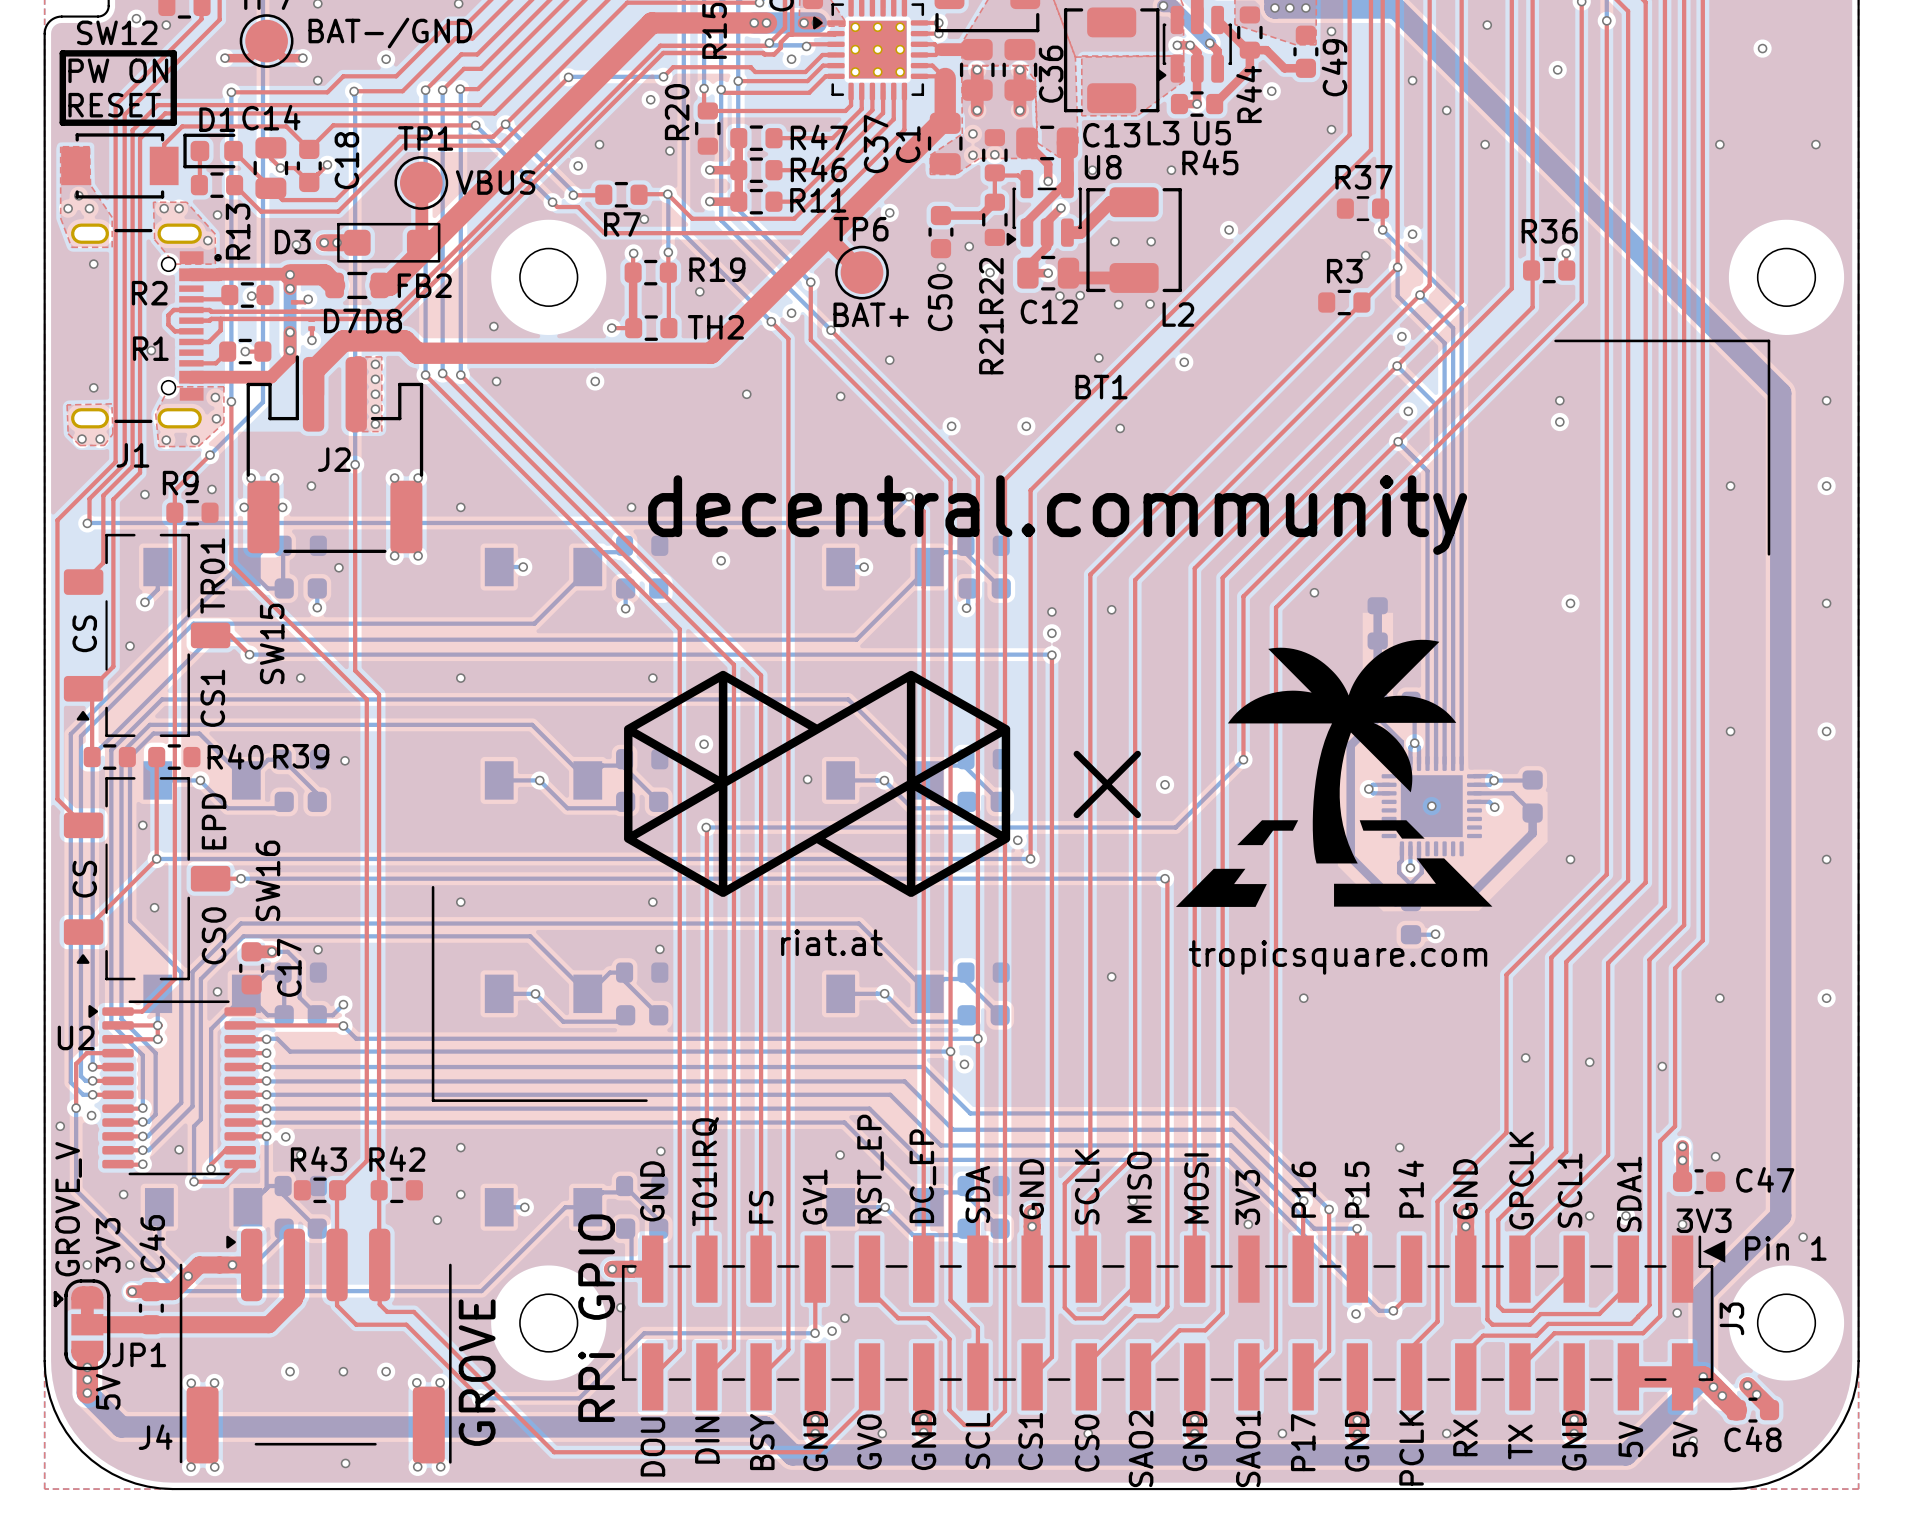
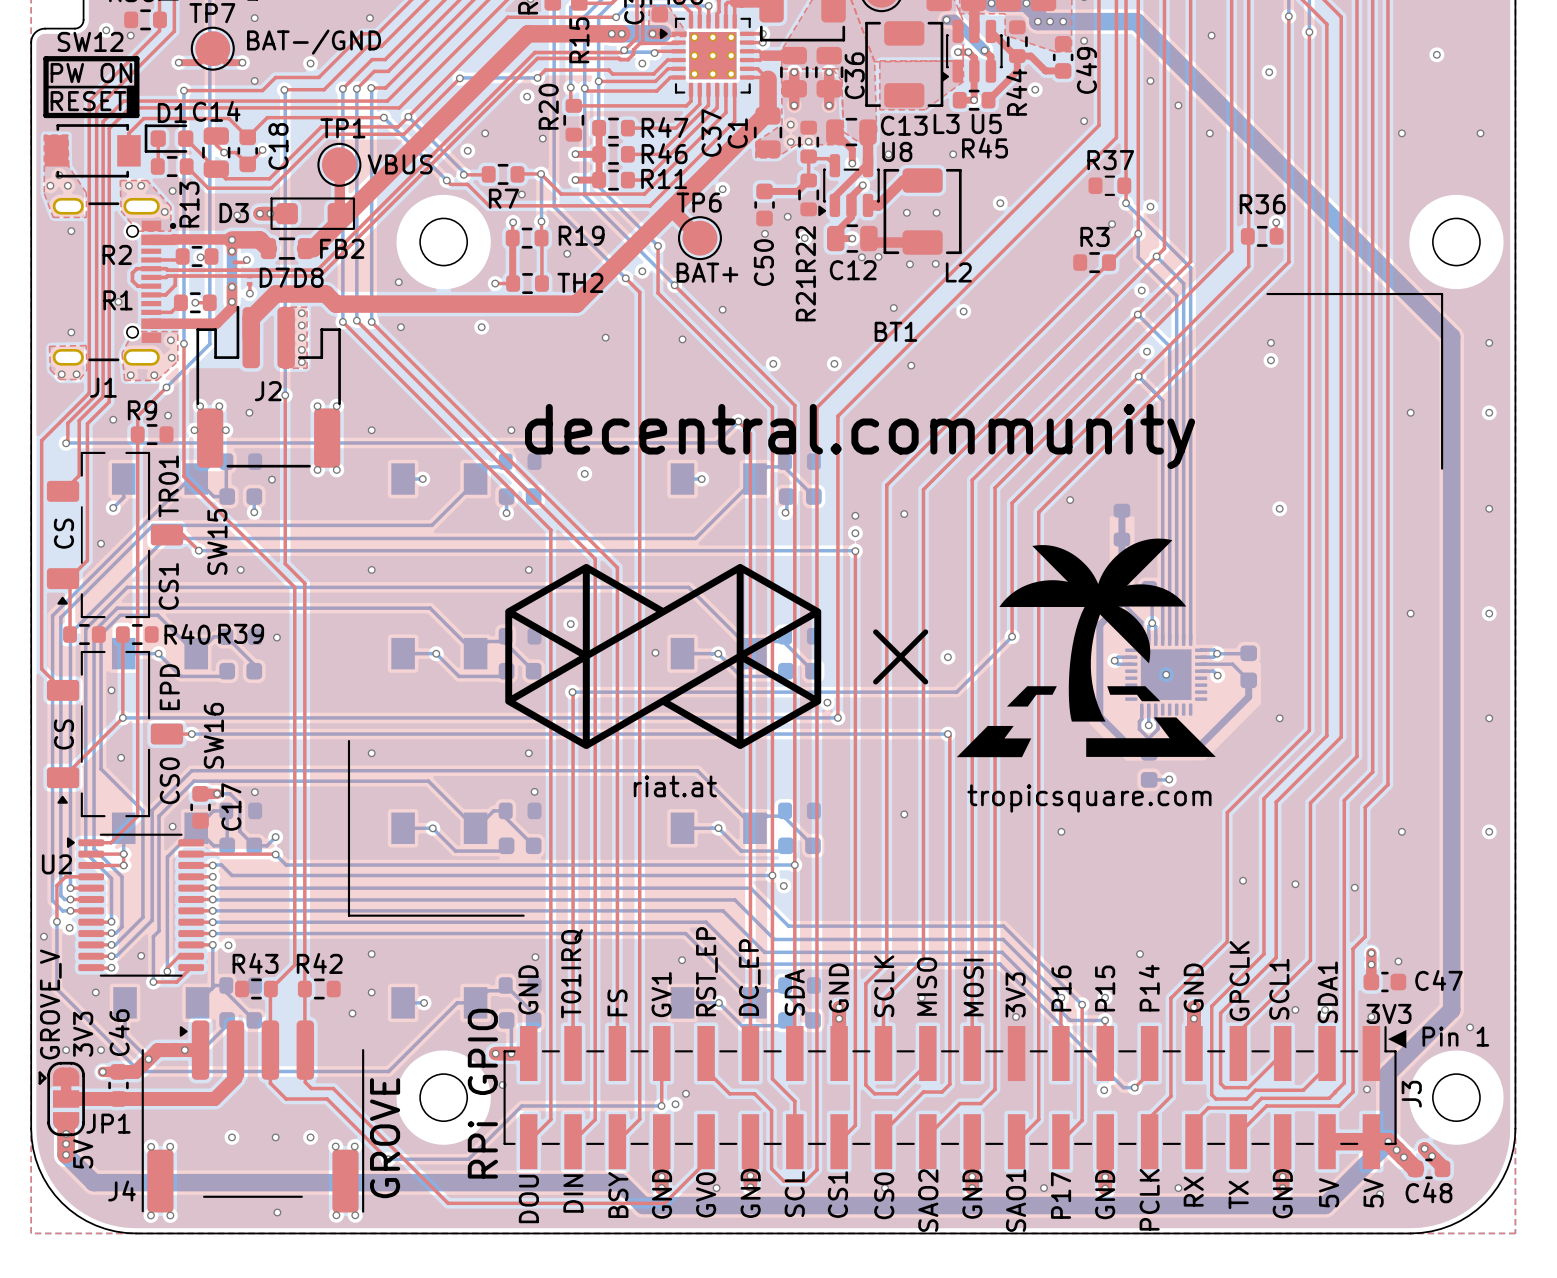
drawing: none -> [126, 85, 137, 115]
line: none -> (46, 87) (136, 87)

